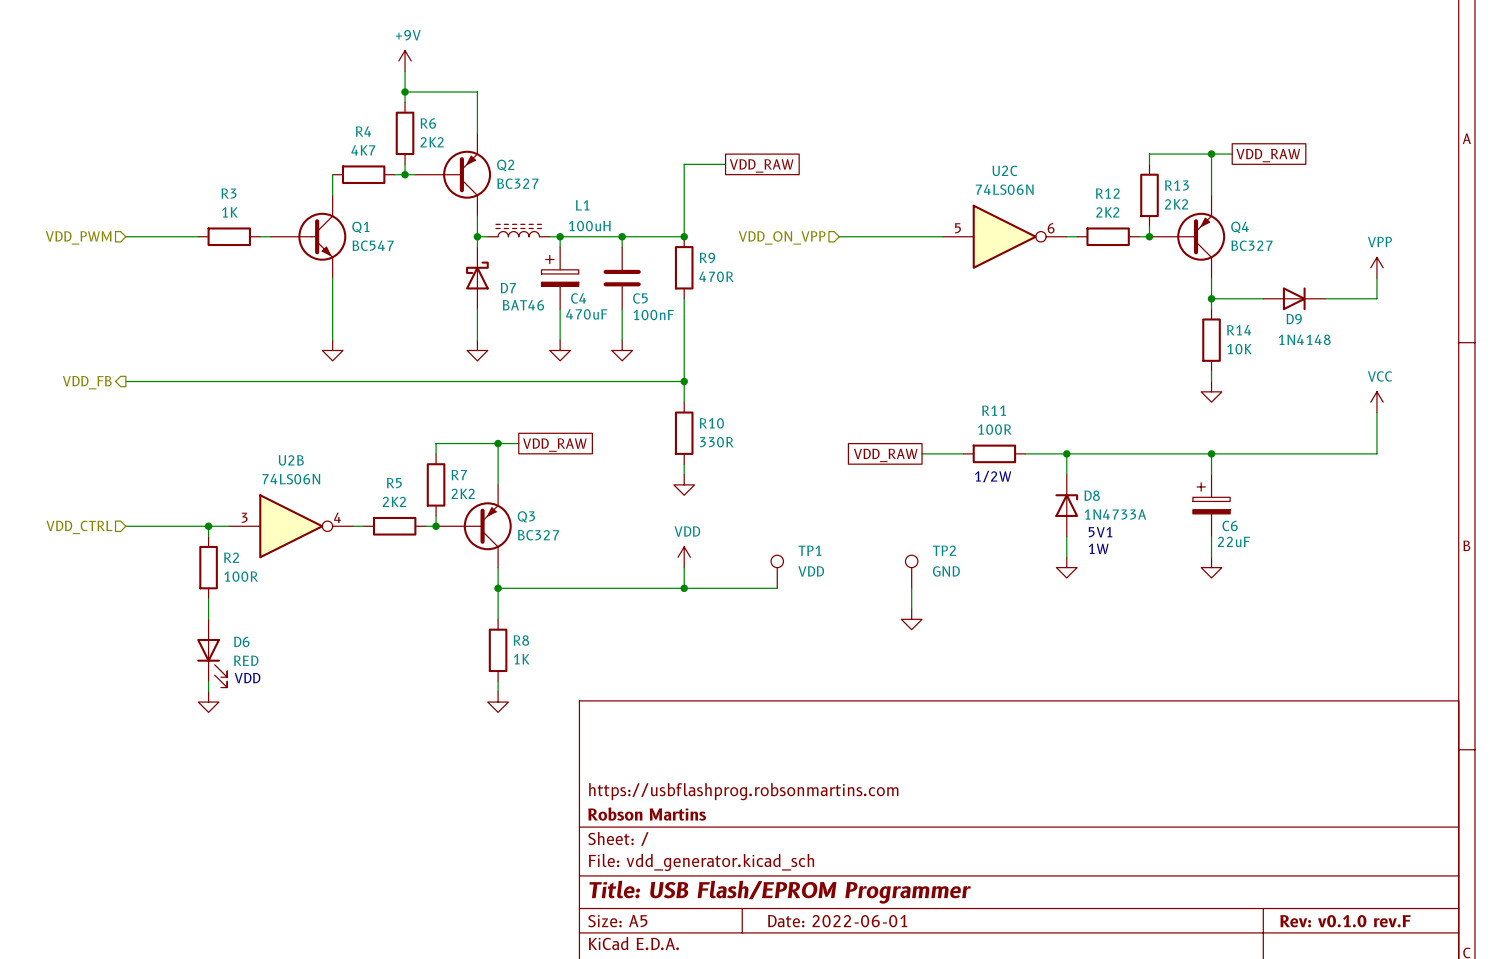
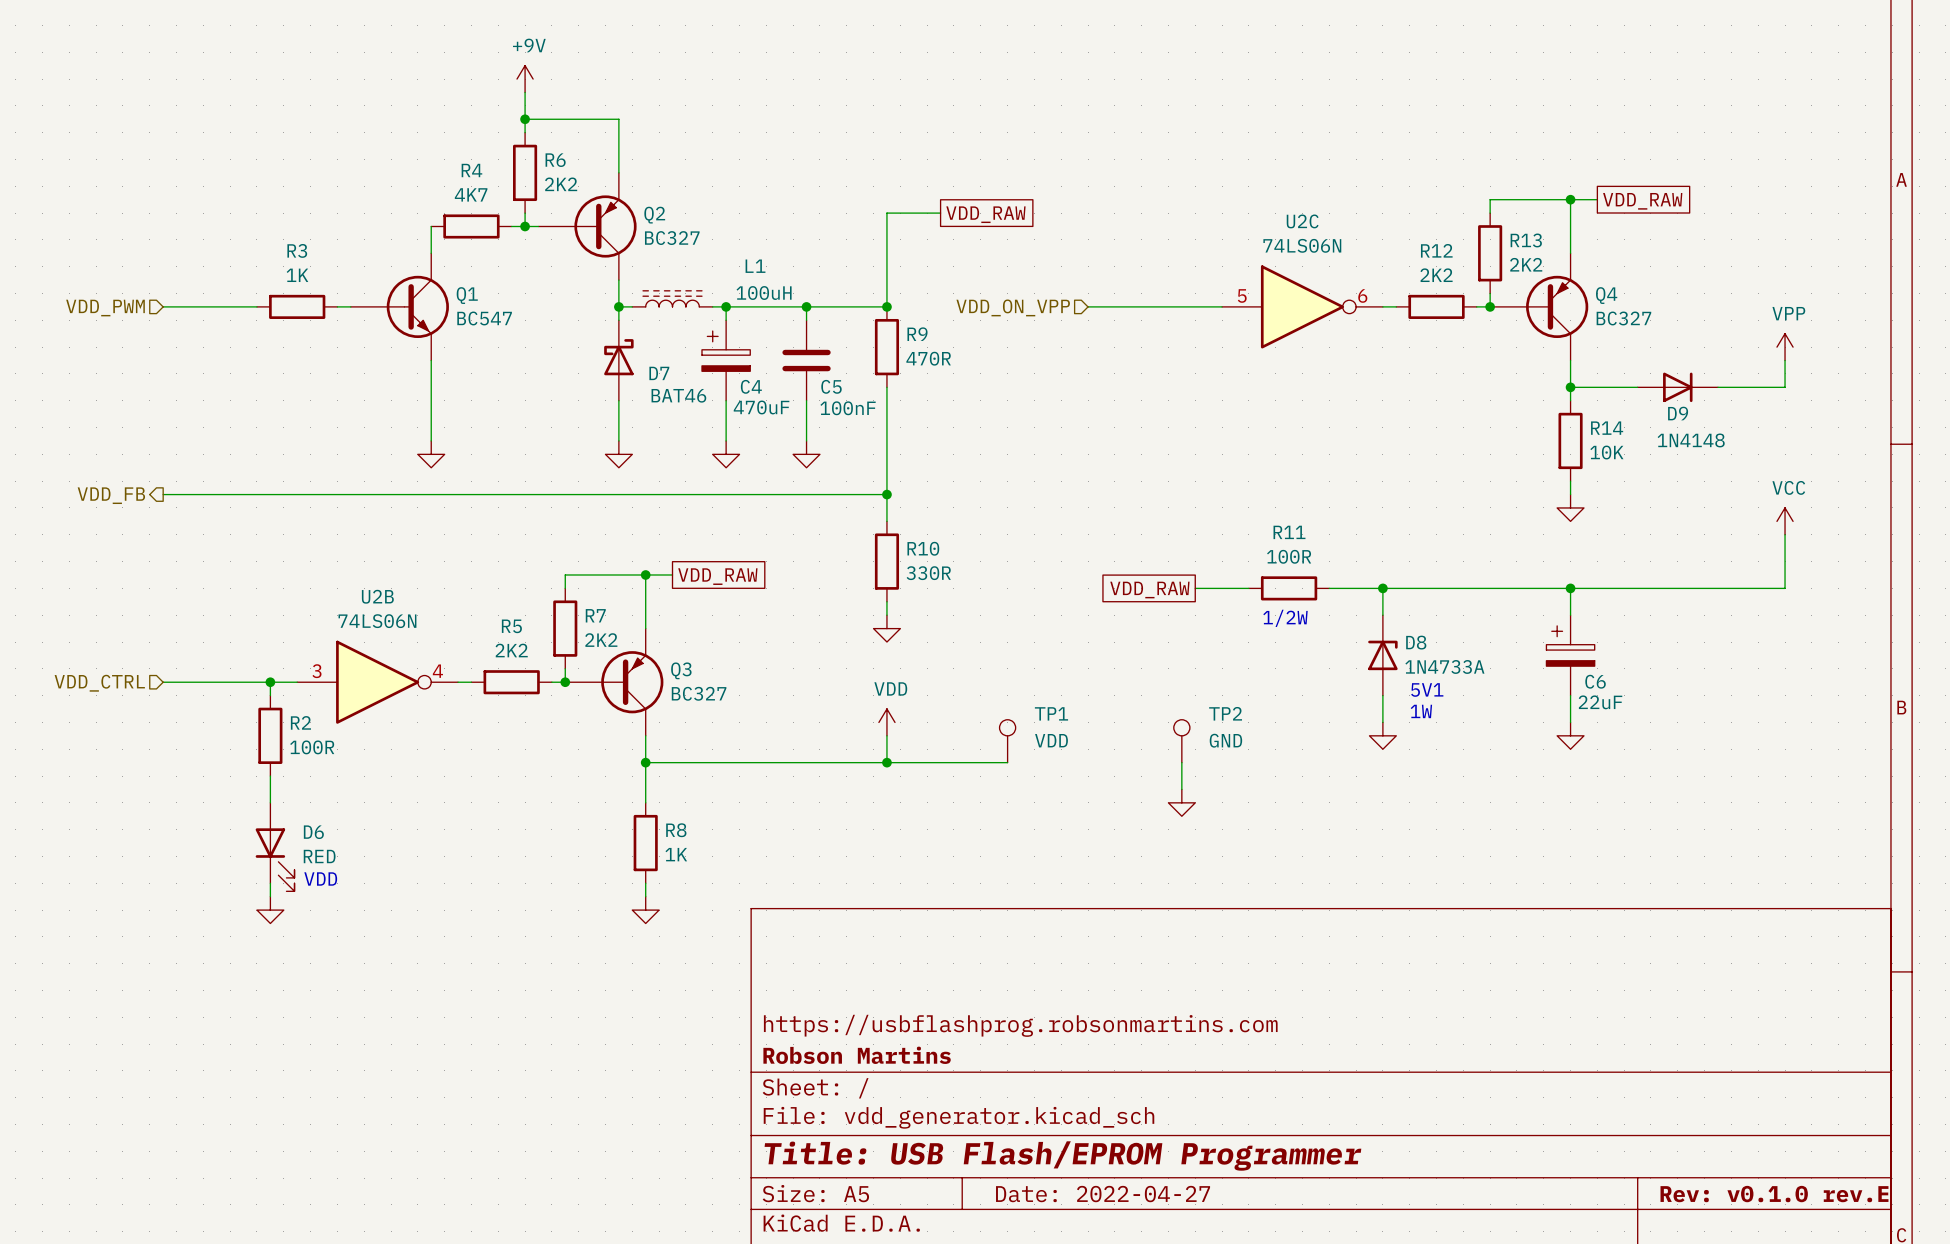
title block: Date: 2022-06-01 (837, 921) -> Date: 2022-04-27 (1103, 1194)
title block: Rev: v0.1.0 rev.F (1345, 921) -> Rev: v0.1.0 rev.E (1774, 1194)

